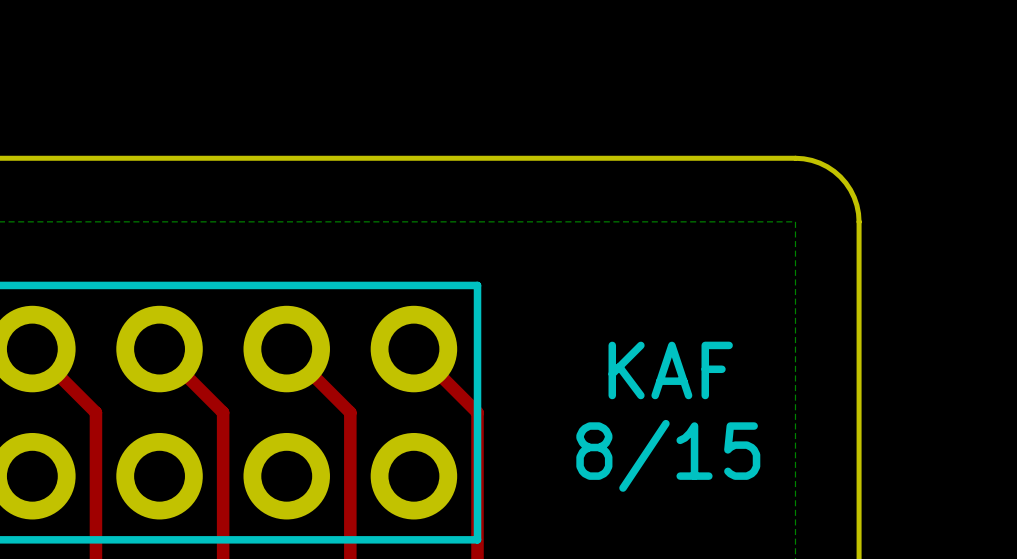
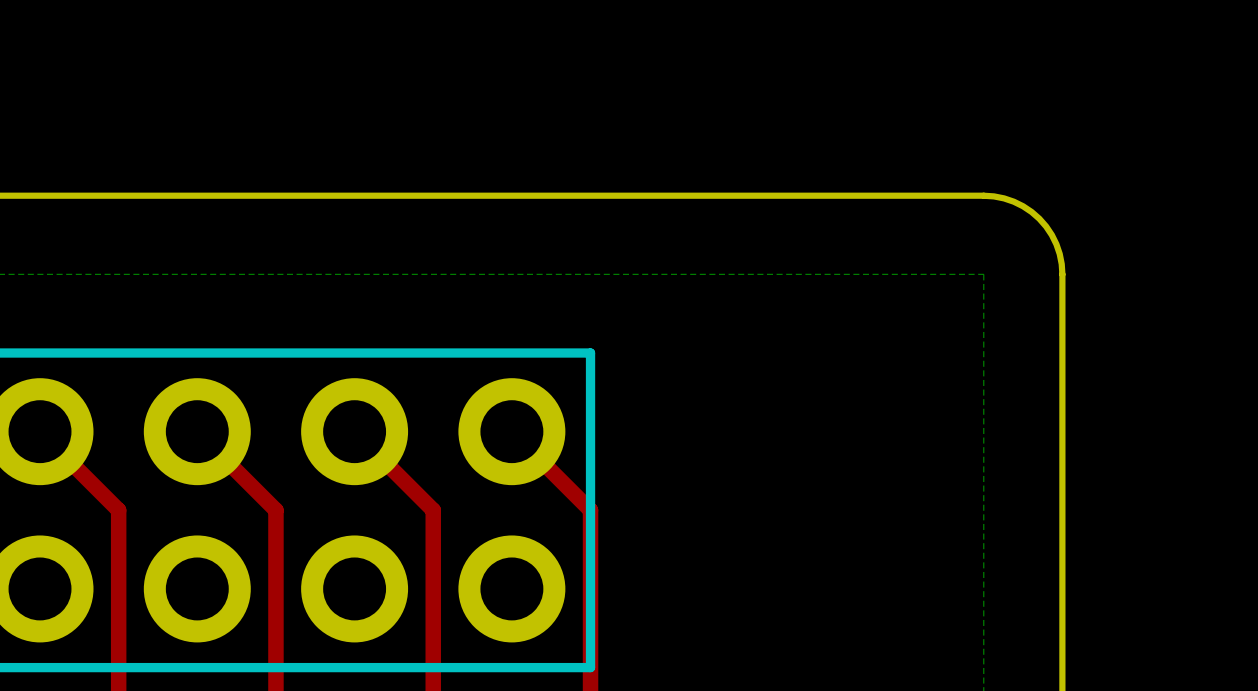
text: KAF (670, 370) -> none
text: 8/15 (668, 455) -> none

